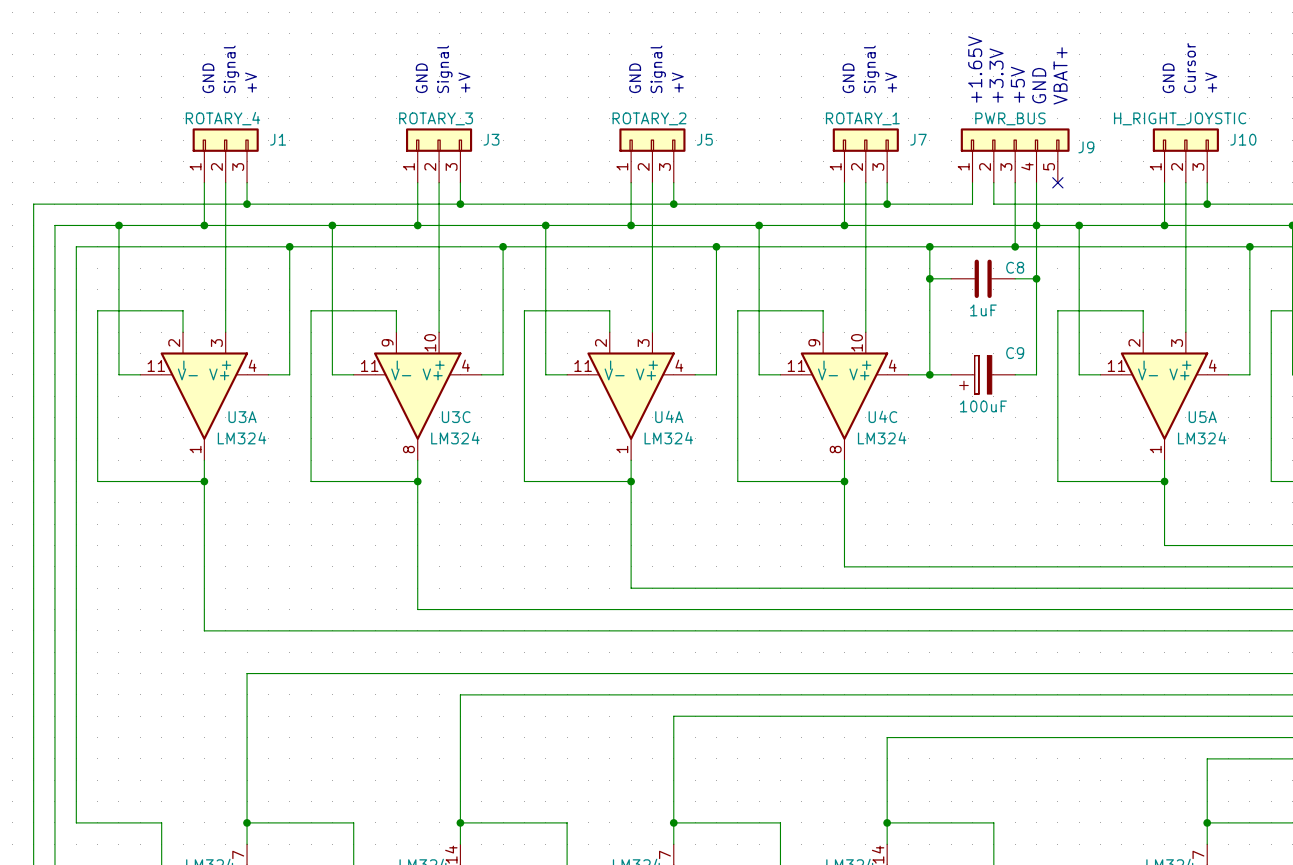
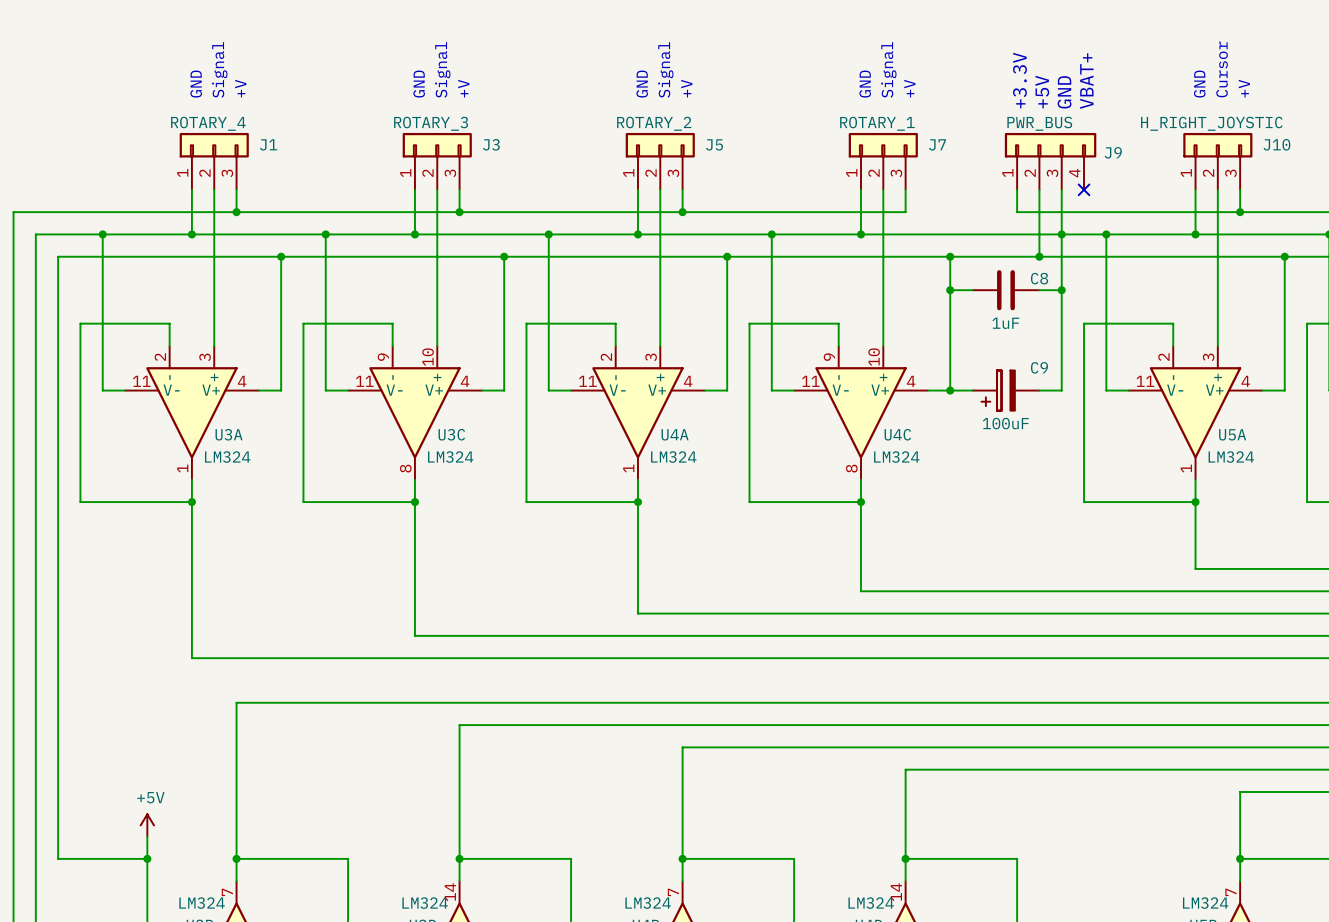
text: +1.65V (975, 69) -> none
J9 symbol: [960, 128, 1070, 183] -> [1004, 132, 1097, 190]
wire: (972, 182) (972, 204) (887, 204) -> none
junction: (887, 204) -> none
power symbol: none -> +5V (147, 825)
wire: none -> (147, 836) (147, 858)
junction: none -> (147, 858)

